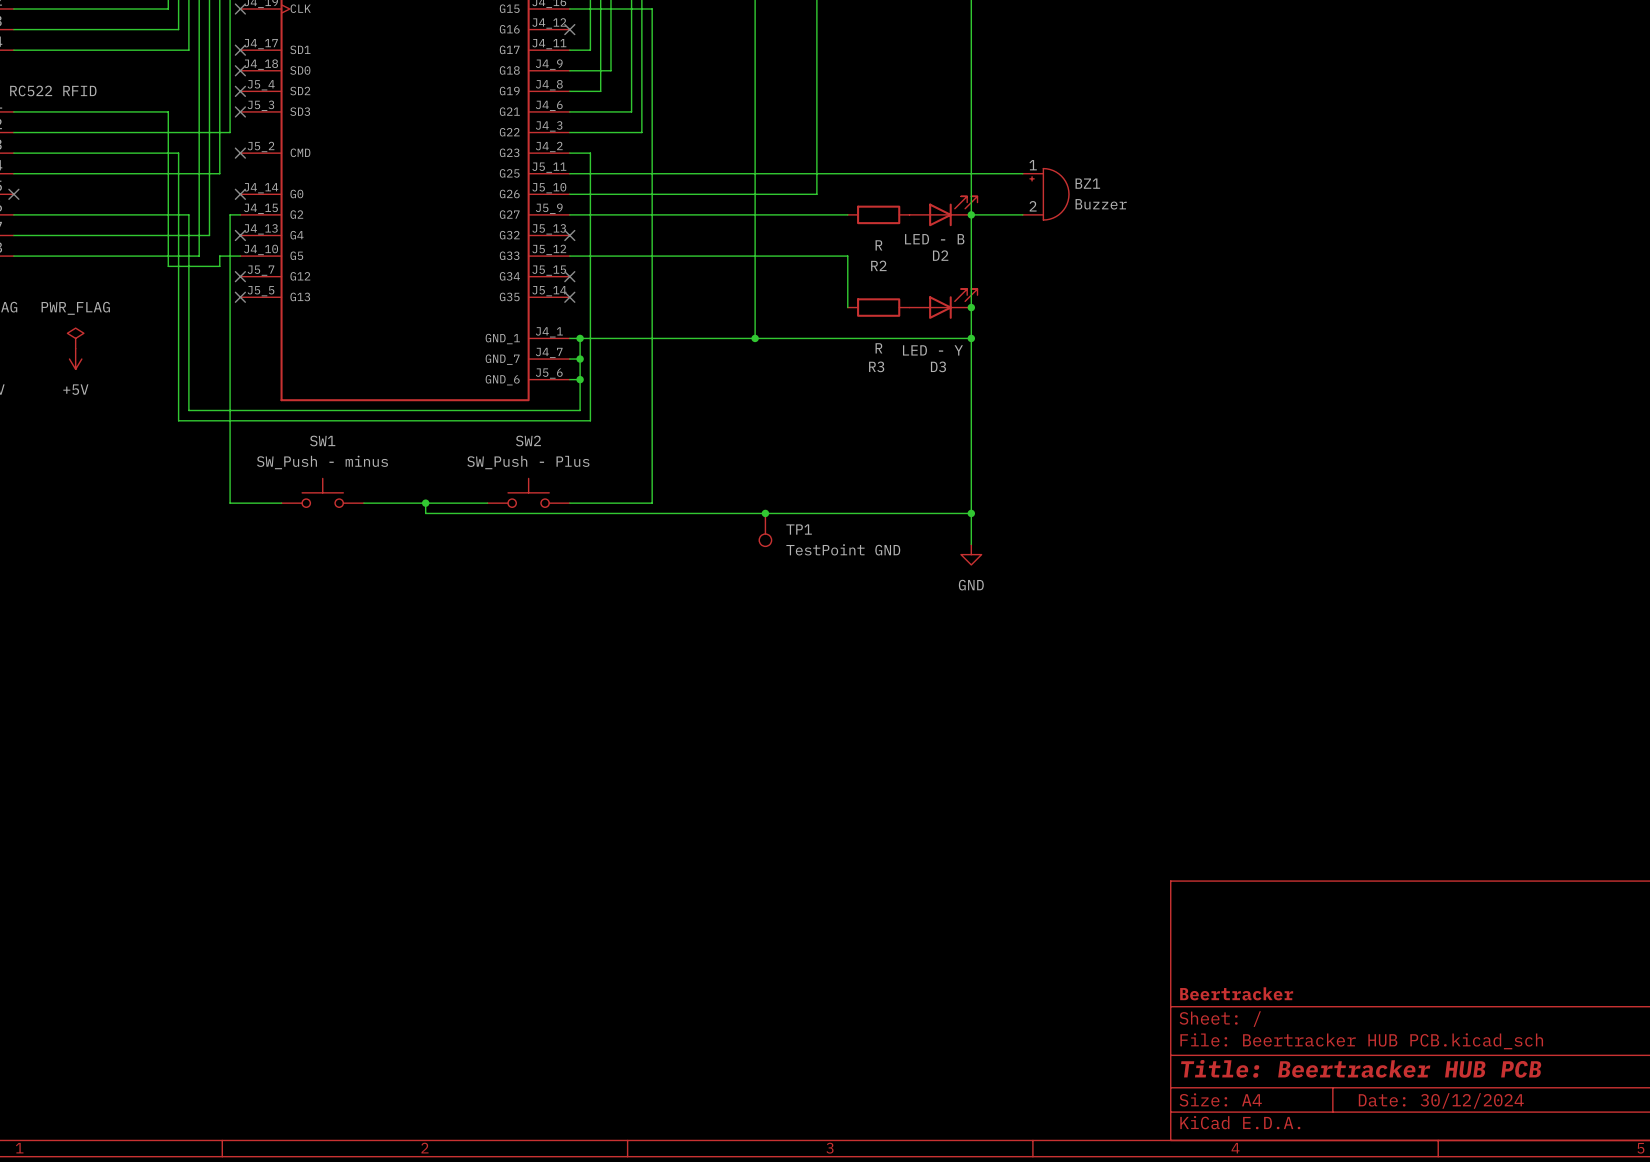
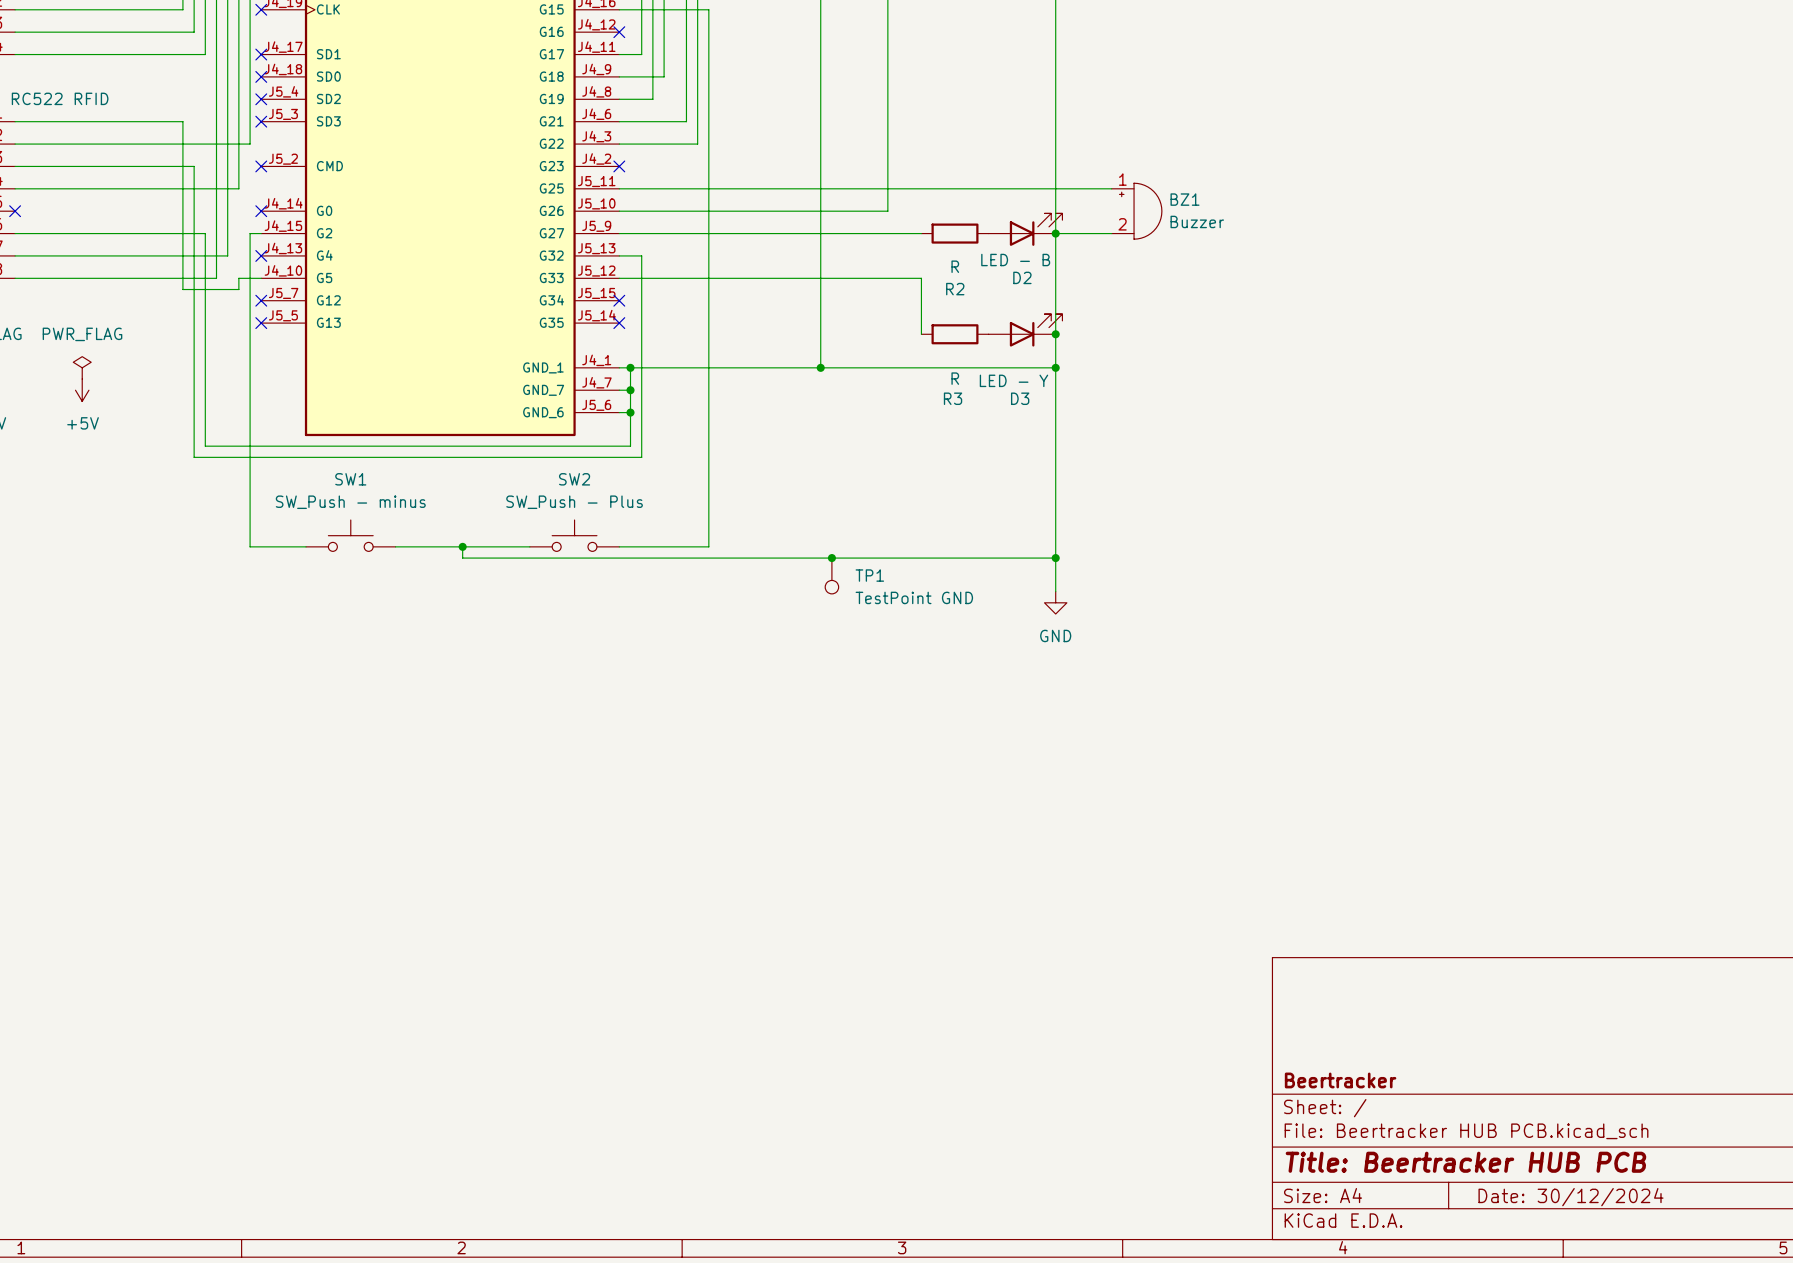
wire: (569, 153) (590, 153) (590, 235) -> (619, 255) (641, 255)
no-connect mark: none -> (619, 166)
no-connect mark: (569, 235) -> none

